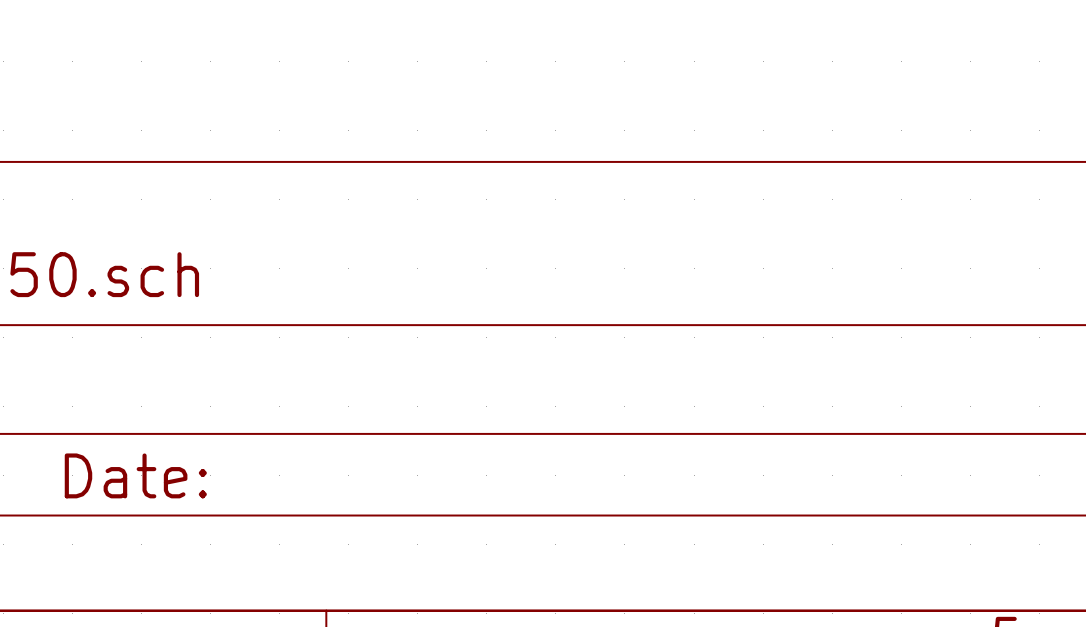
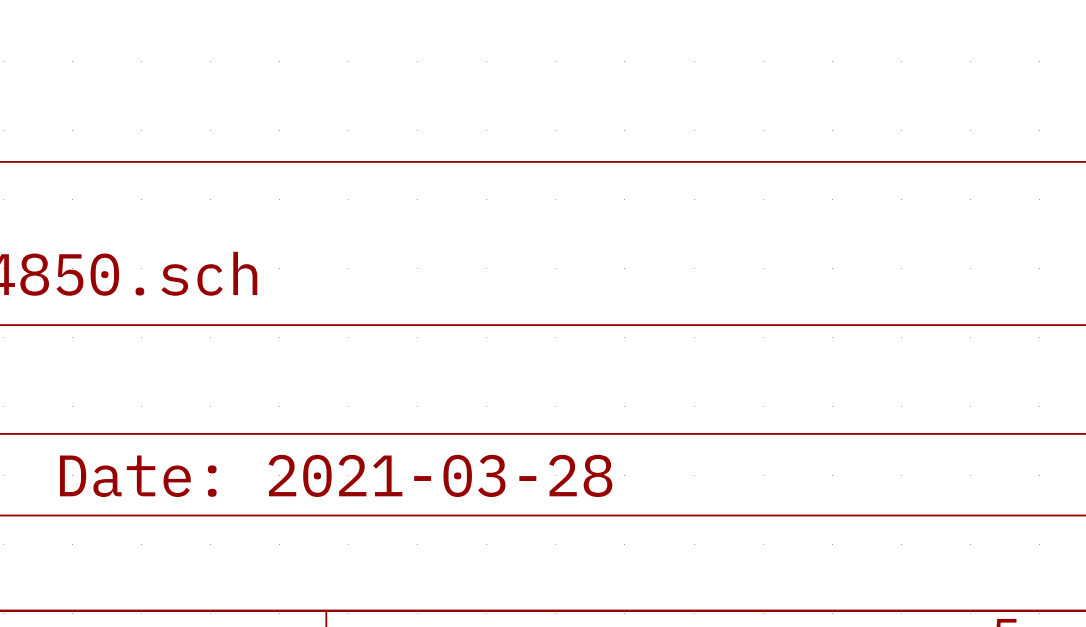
title block: Date: (135, 475) -> Date: 2021-03-28 (336, 475)

